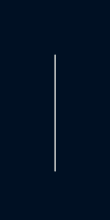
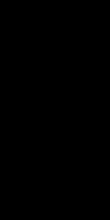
board edge: (55, 55) (55, 170) -> none

